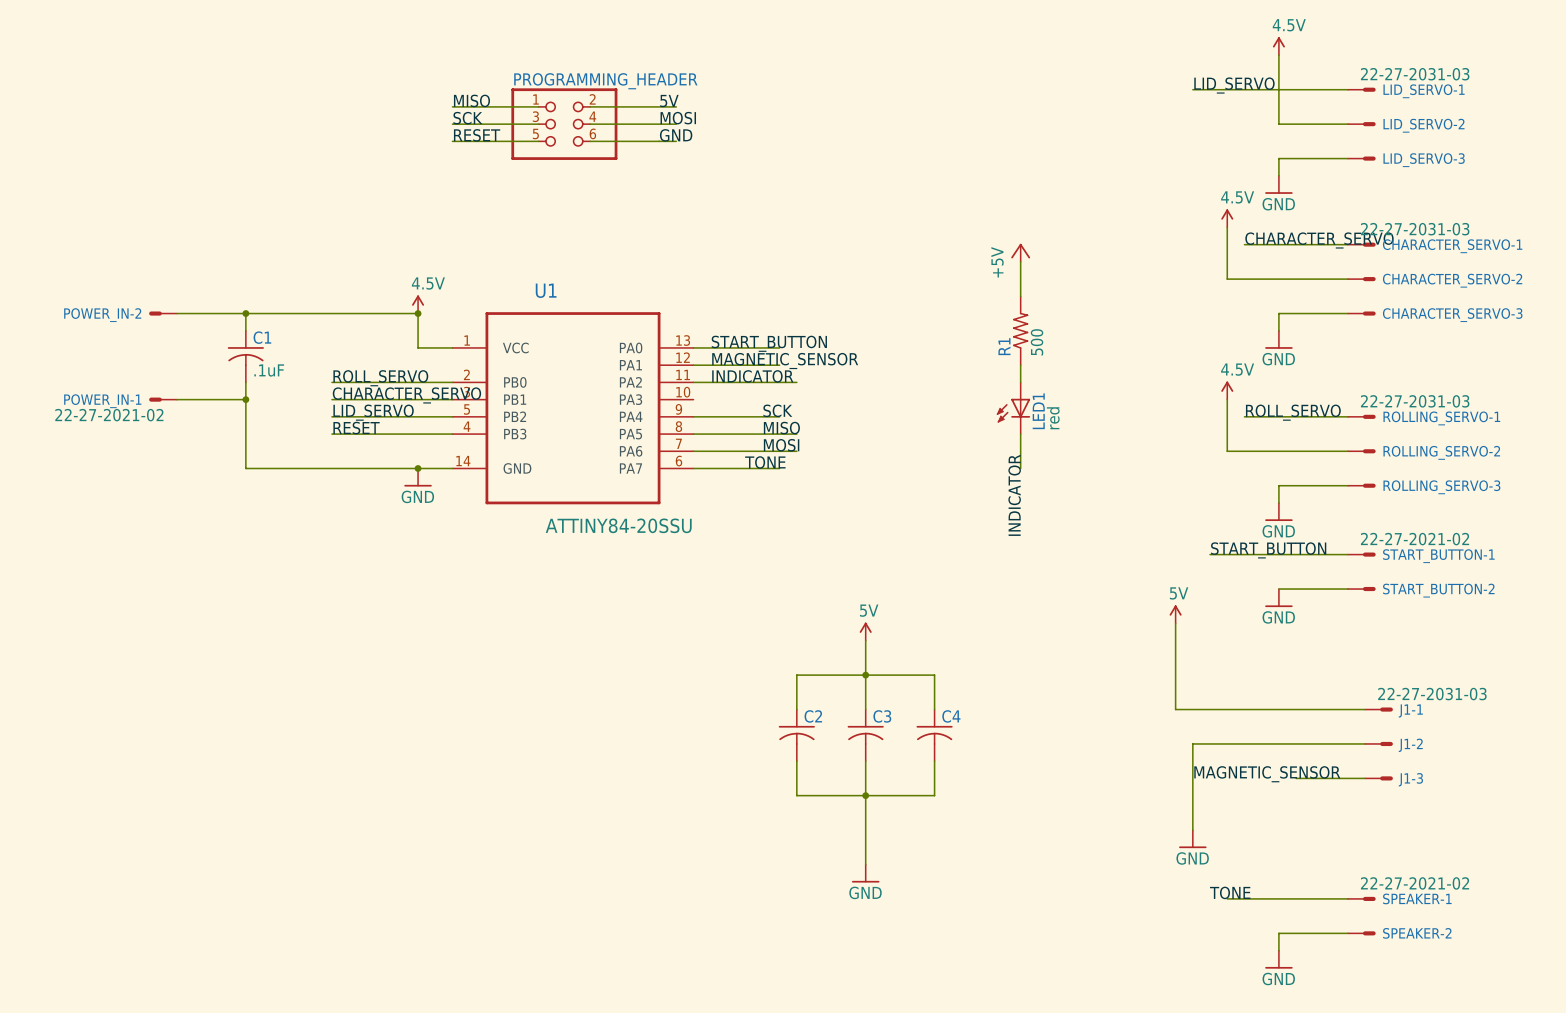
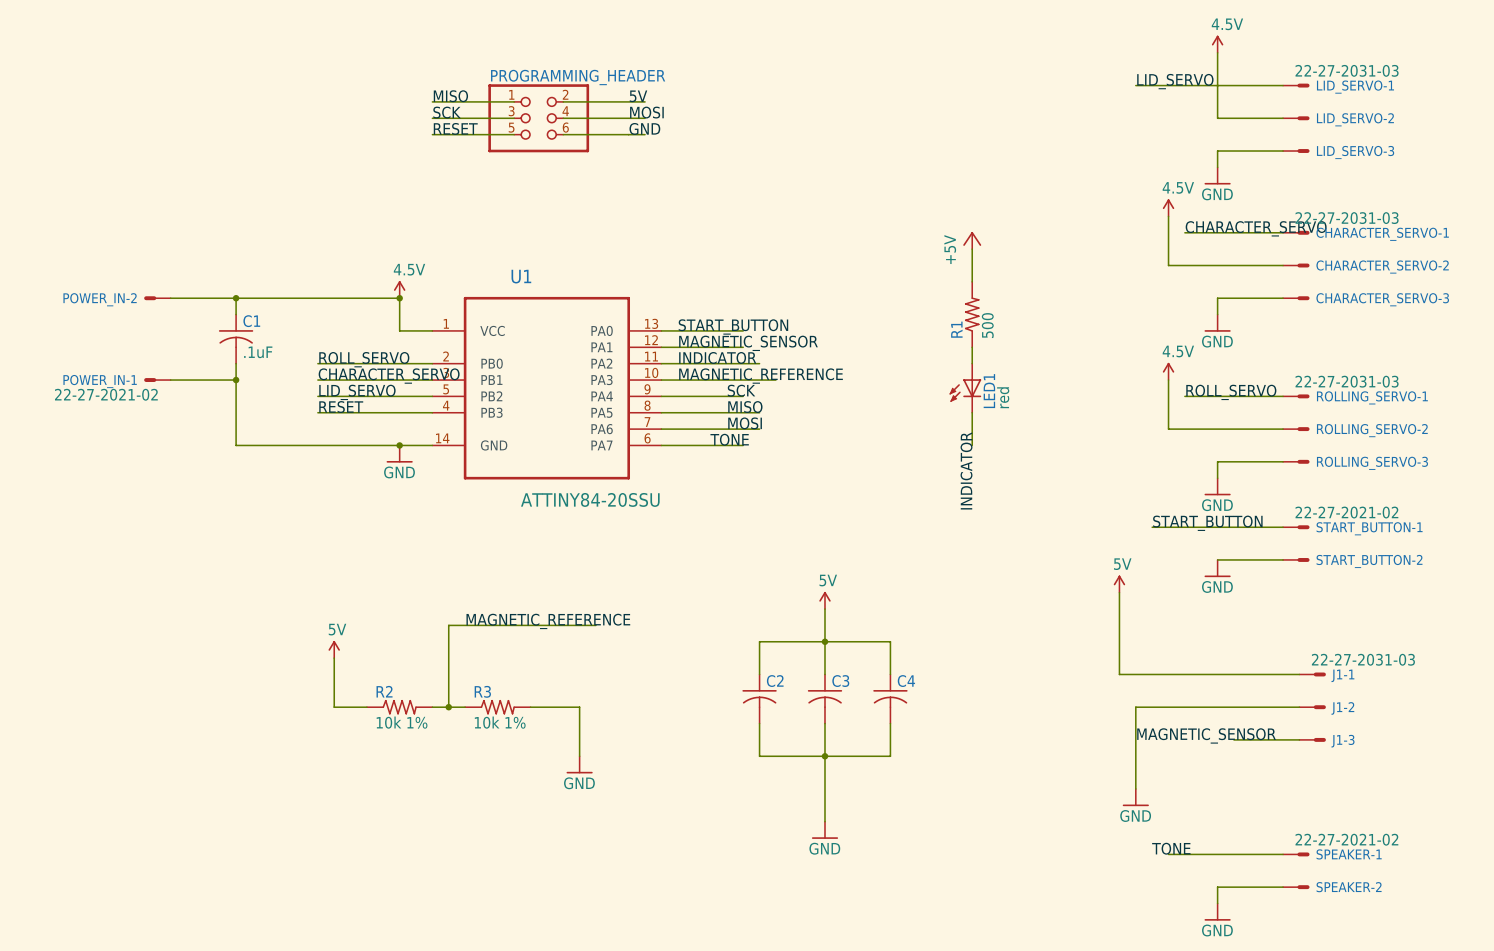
label: none -> MAGNETIC_REFERENCE (761, 376)
wire: none -> (661, 380) (775, 380)
label: none -> MAGNETIC_REFERENCE (548, 621)
wire: none -> (595, 625) (448, 625) (448, 707)
power symbol: none -> 5V (334, 649)
wire: none -> (334, 658) (334, 707) (366, 707)
R2: none -> 10k 1% (399, 707)
wire: none -> (432, 707) (465, 707)
junction: none -> (448, 707)
R3: none -> 10k 1% (497, 707)
wire: none -> (530, 707) (579, 707) (579, 756)
power symbol: none -> GND (579, 764)

